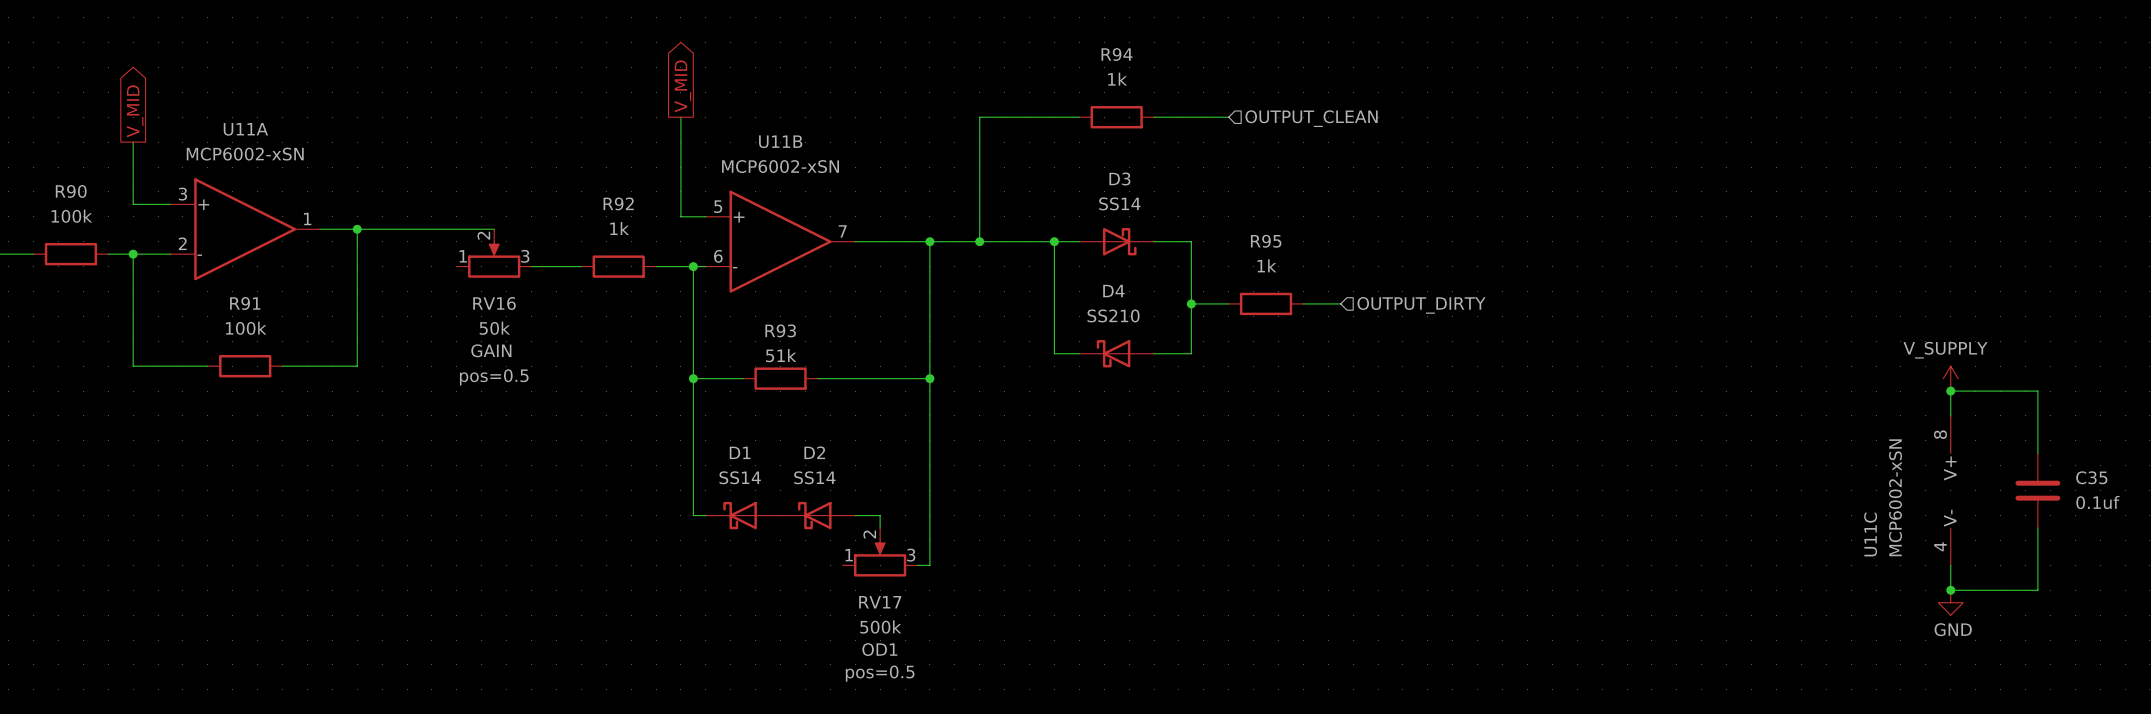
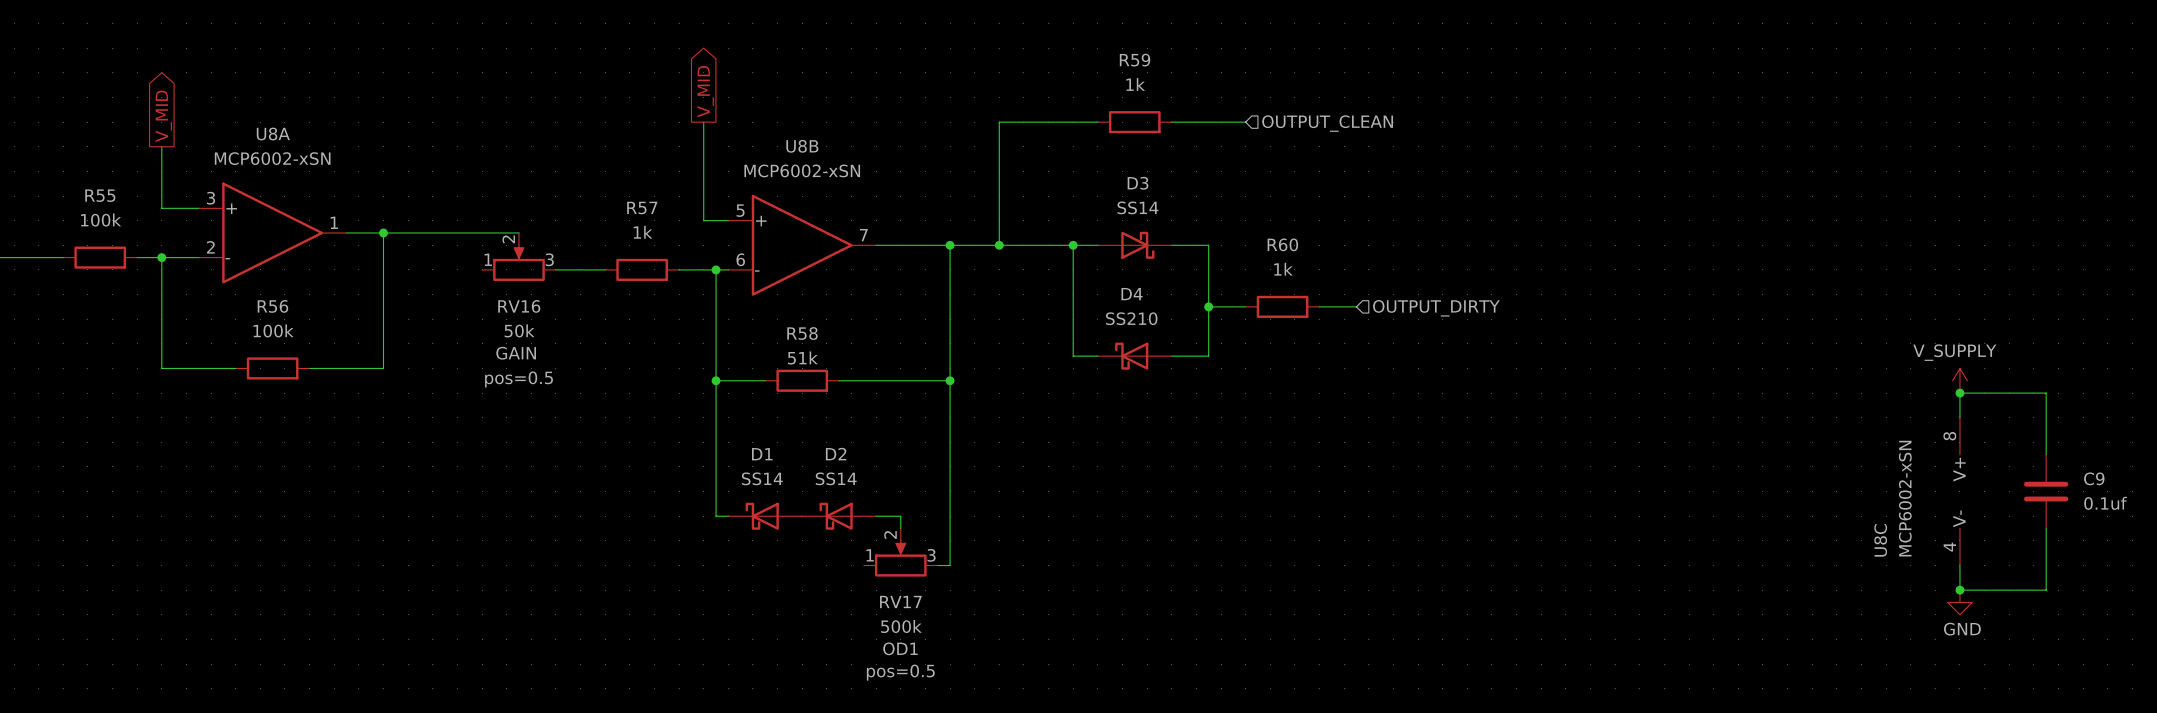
R94 name: R94 (1117, 54) -> R59 (1135, 60)
U11A name: U11A (245, 129) -> U8A (273, 134)
U11B name: U11B (780, 141) -> U8B (802, 146)
R90 name: R90 (71, 191) -> R55 (100, 195)
R92 name: R92 (618, 203) -> R57 (642, 208)
R95 name: R95 (1266, 241) -> R60 (1282, 244)
R91 name: R91 (245, 303) -> R56 (272, 306)
R93 name: R93 (780, 330) -> R58 (802, 333)
C35 name: C35 (2091, 477) -> C9 (2094, 478)
U11C name: U11C (1870, 534) -> U8C (1880, 540)

